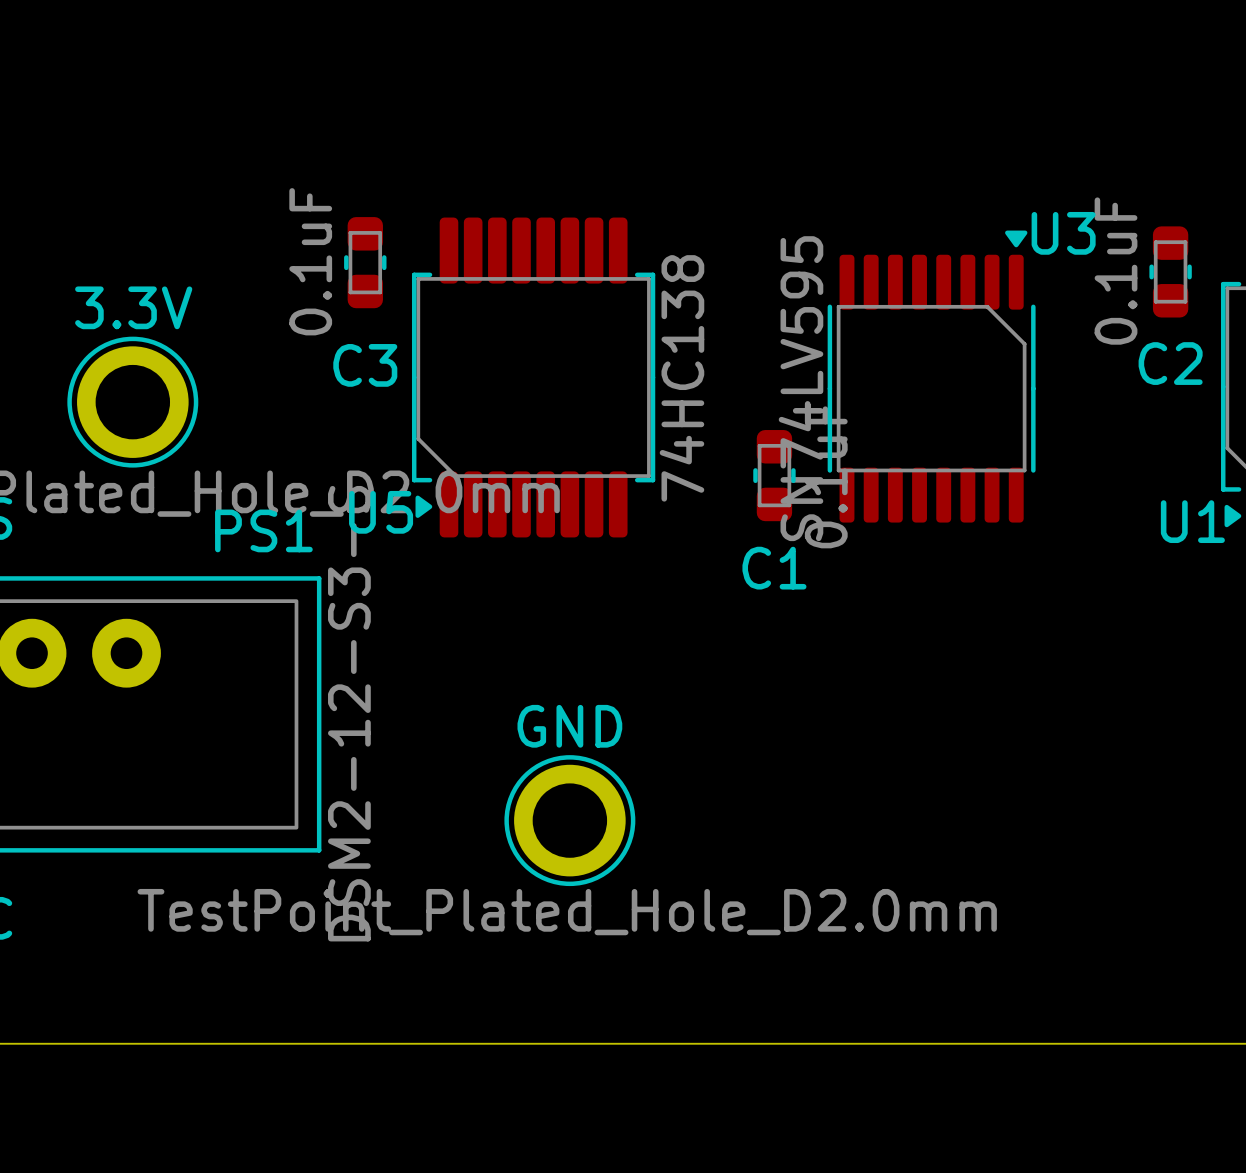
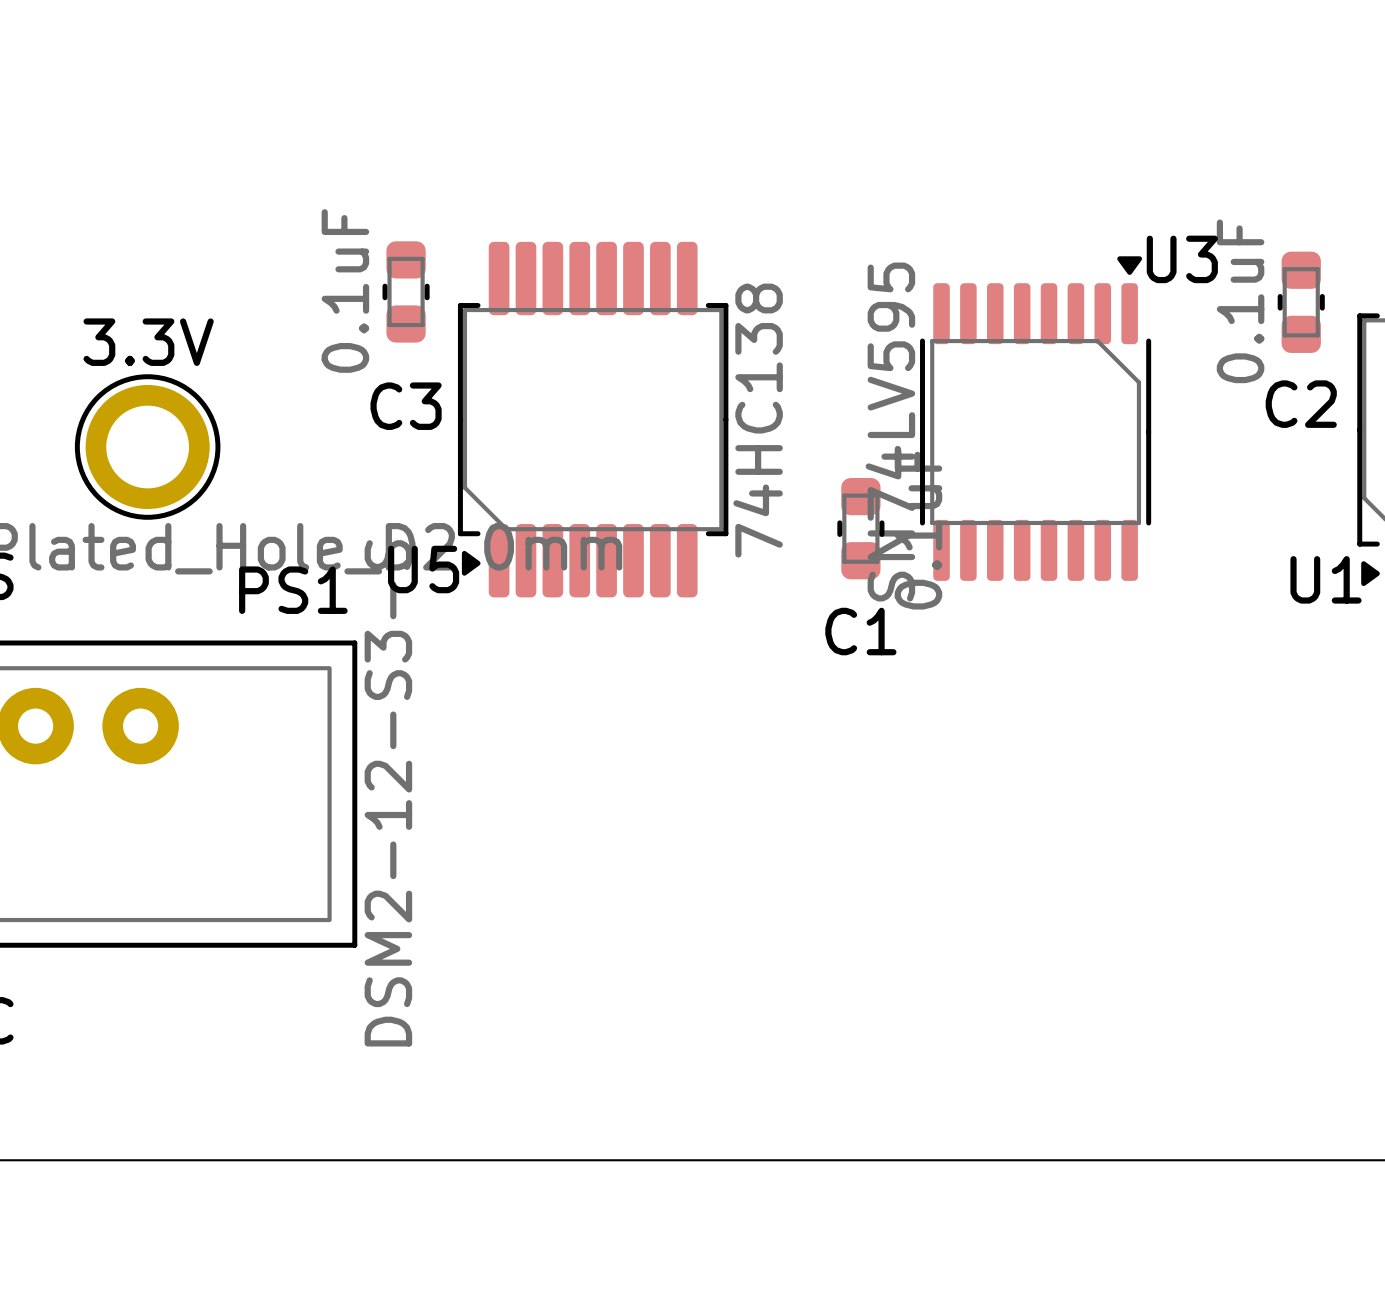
GND: TestPoint_Plated_Hole_D2.0mm (569, 820) -> none

